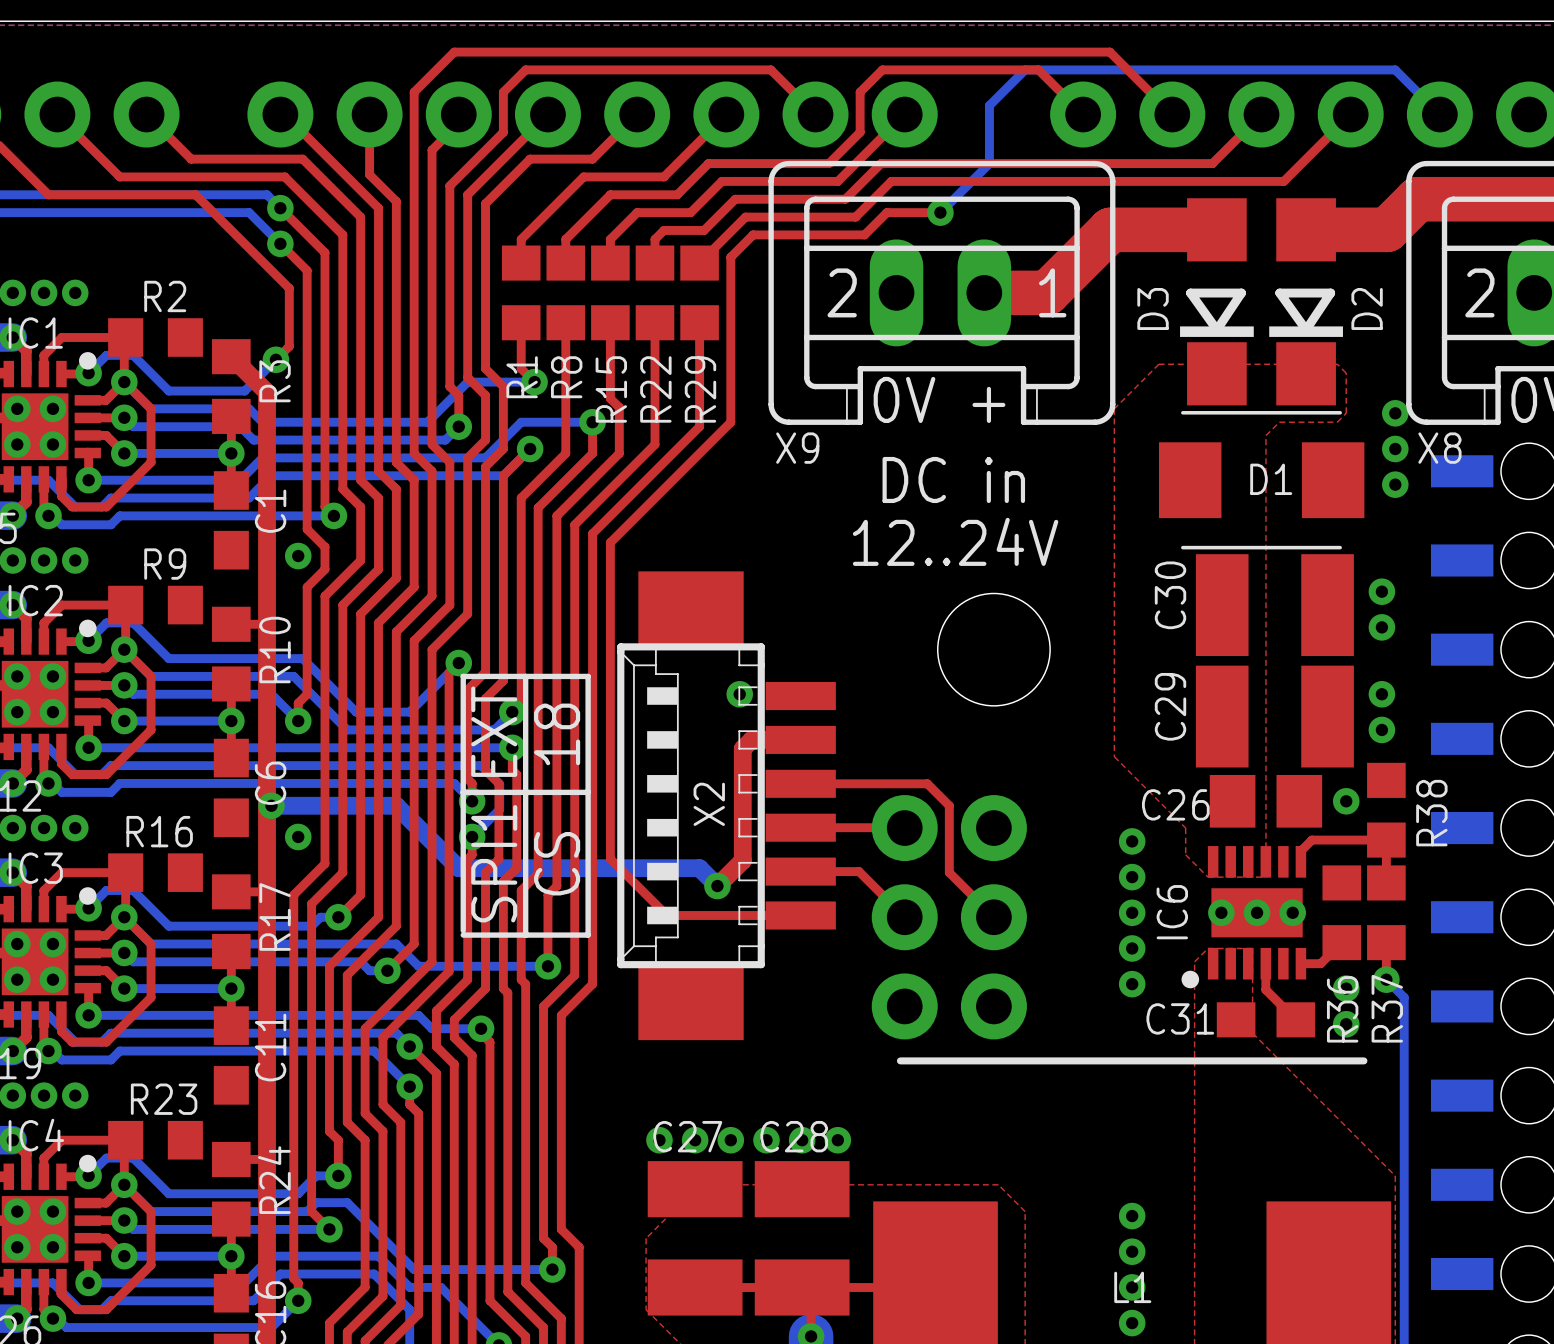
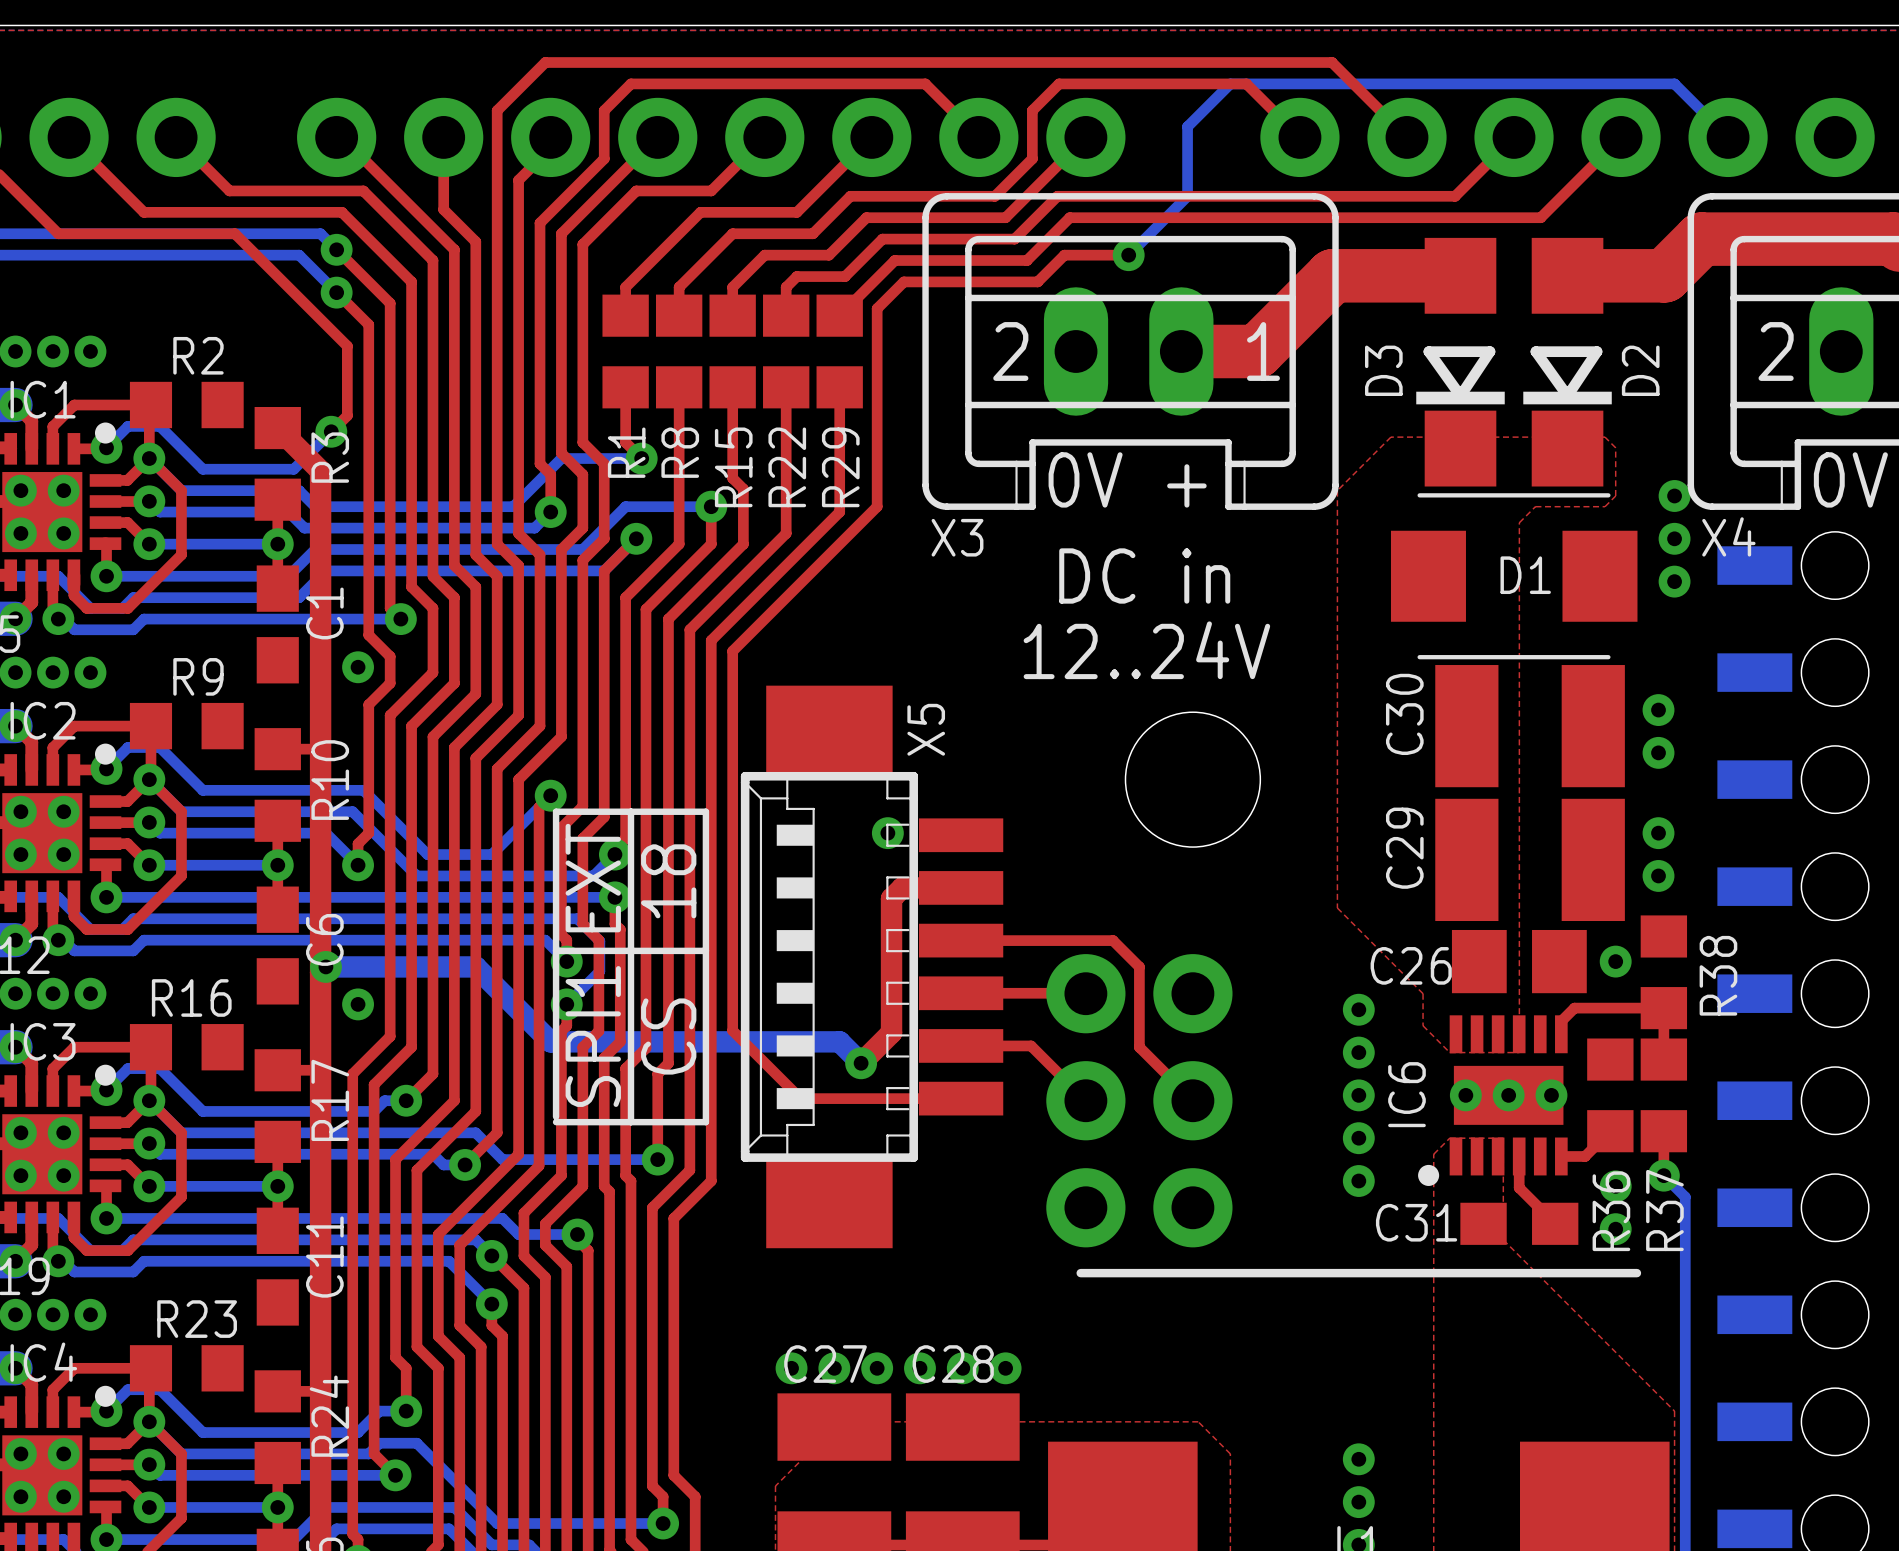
X9 name: X9 (797, 448) -> X3 (957, 537)
X8 name: X8 (1439, 448) -> X4 (1728, 536)
X2 name: X2 (709, 804) -> X5 (926, 729)

